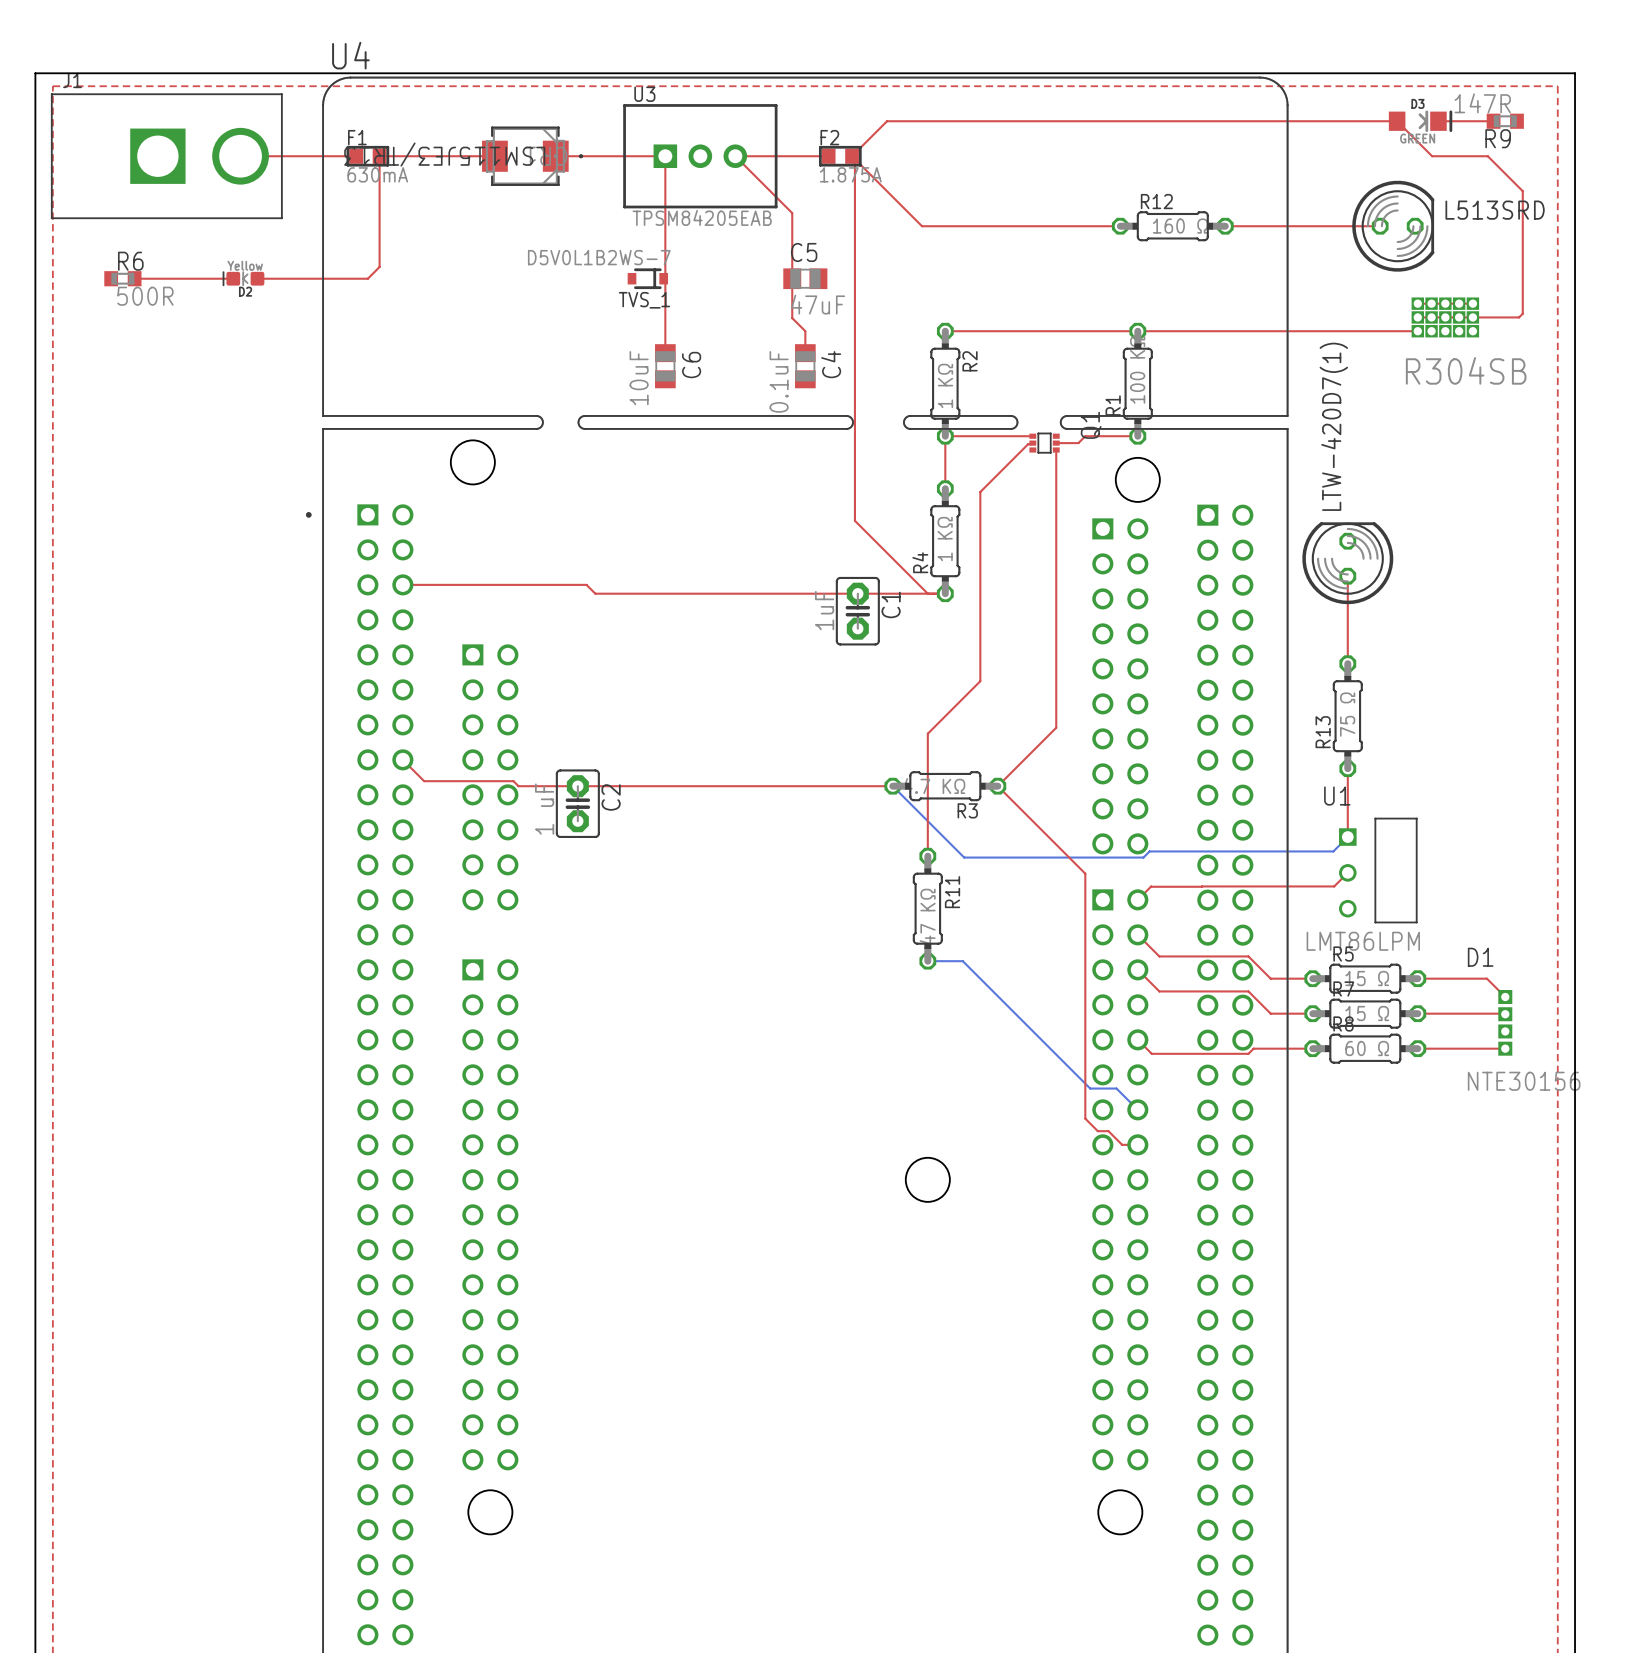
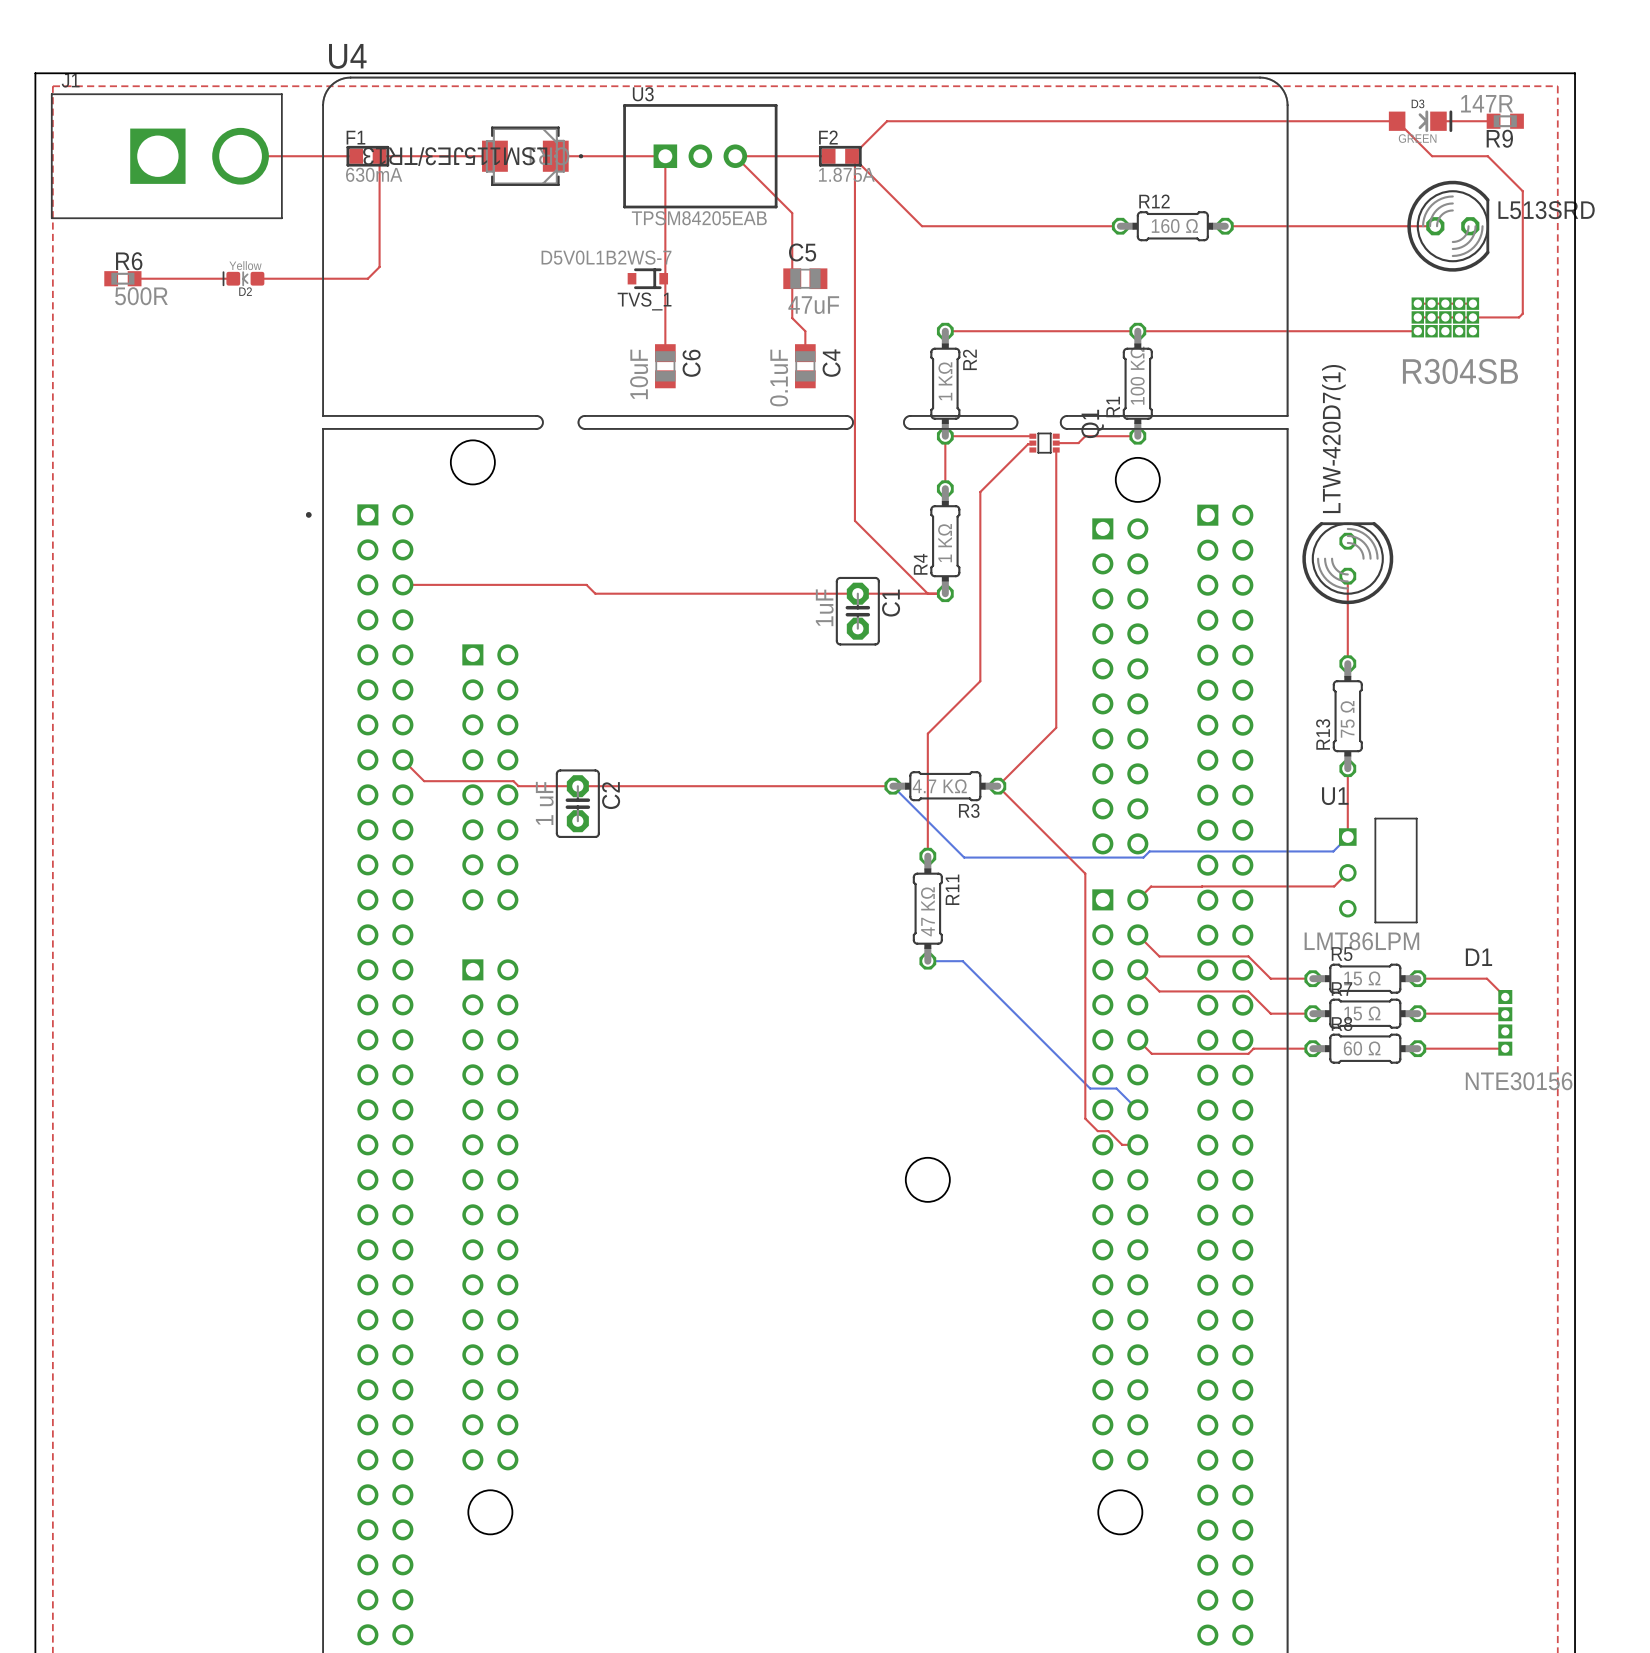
L513SRD footprint: [1352, 180, 1435, 272] -> [1407, 180, 1490, 272]
top track: none -> (1380, 226) (1435, 226)

